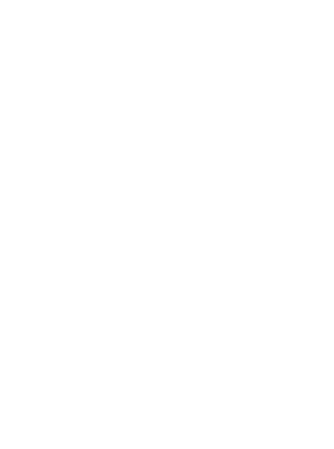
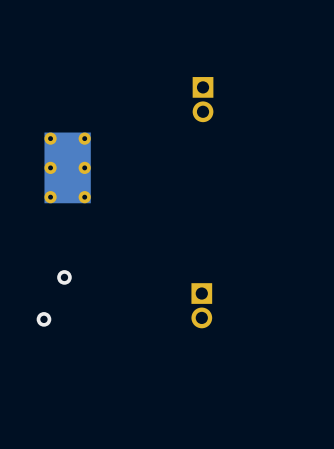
part: none -> (203, 99)
part: none -> (67, 167)
via: none -> (64, 277)
part: none -> (201, 305)
via: none -> (43, 319)

